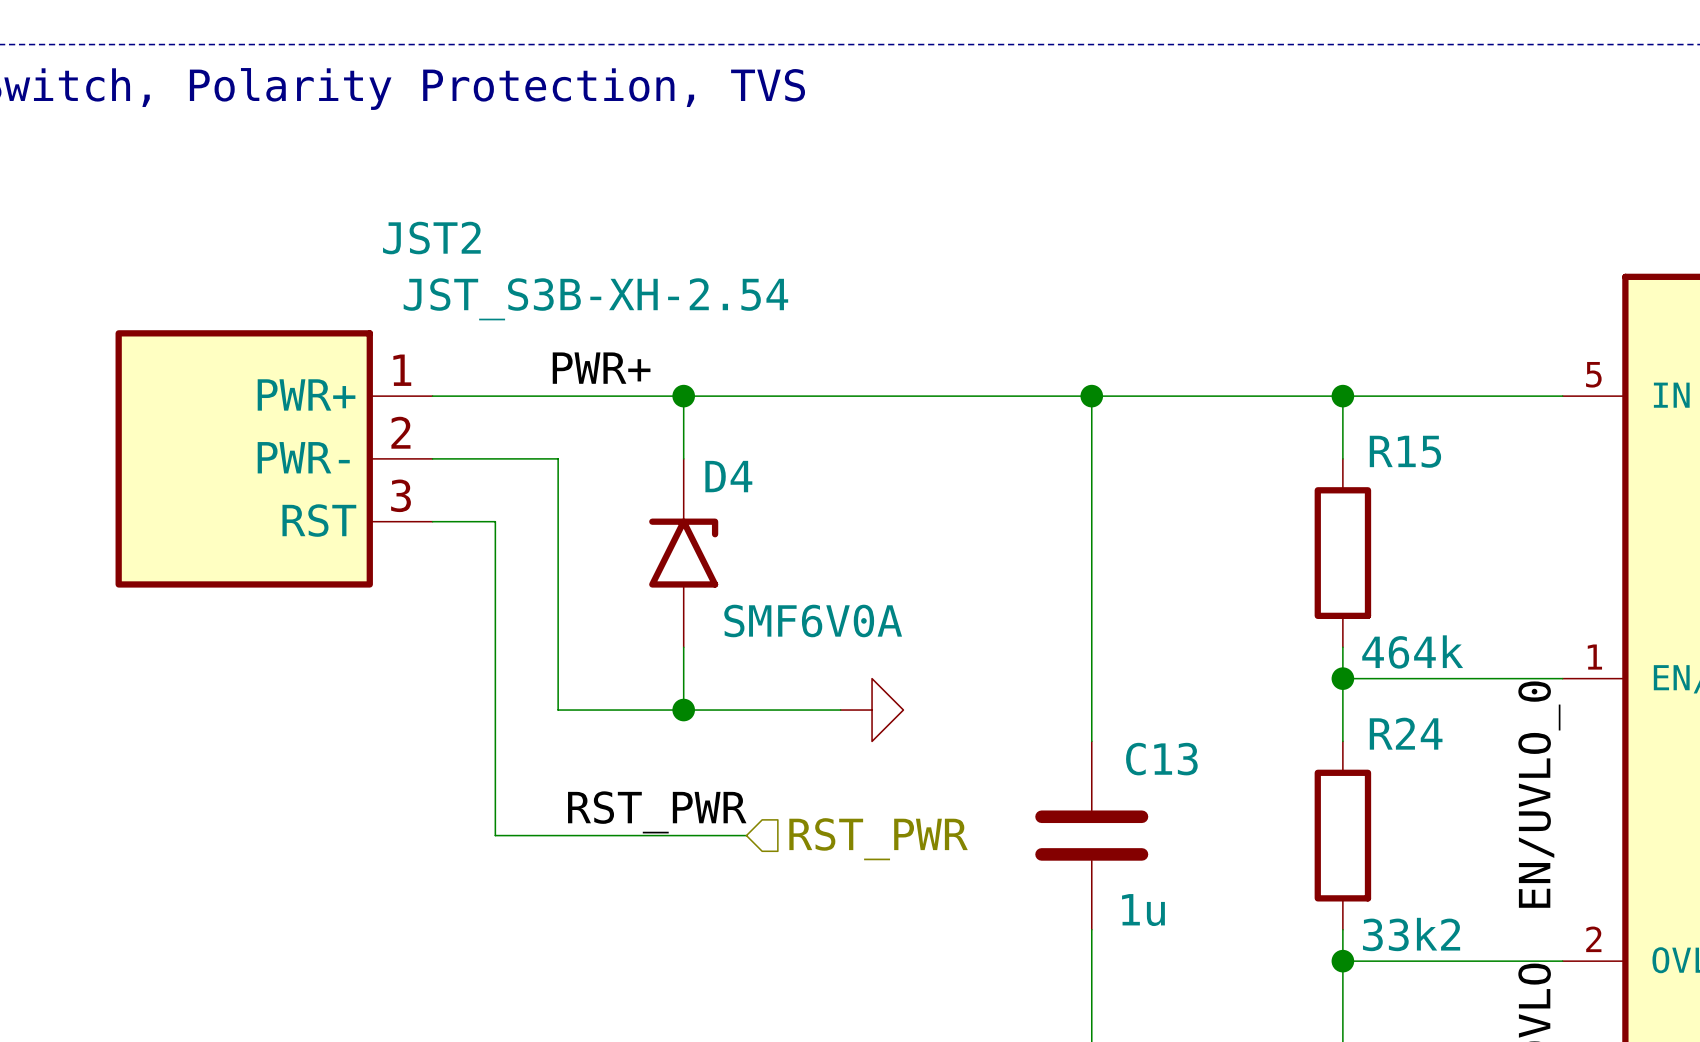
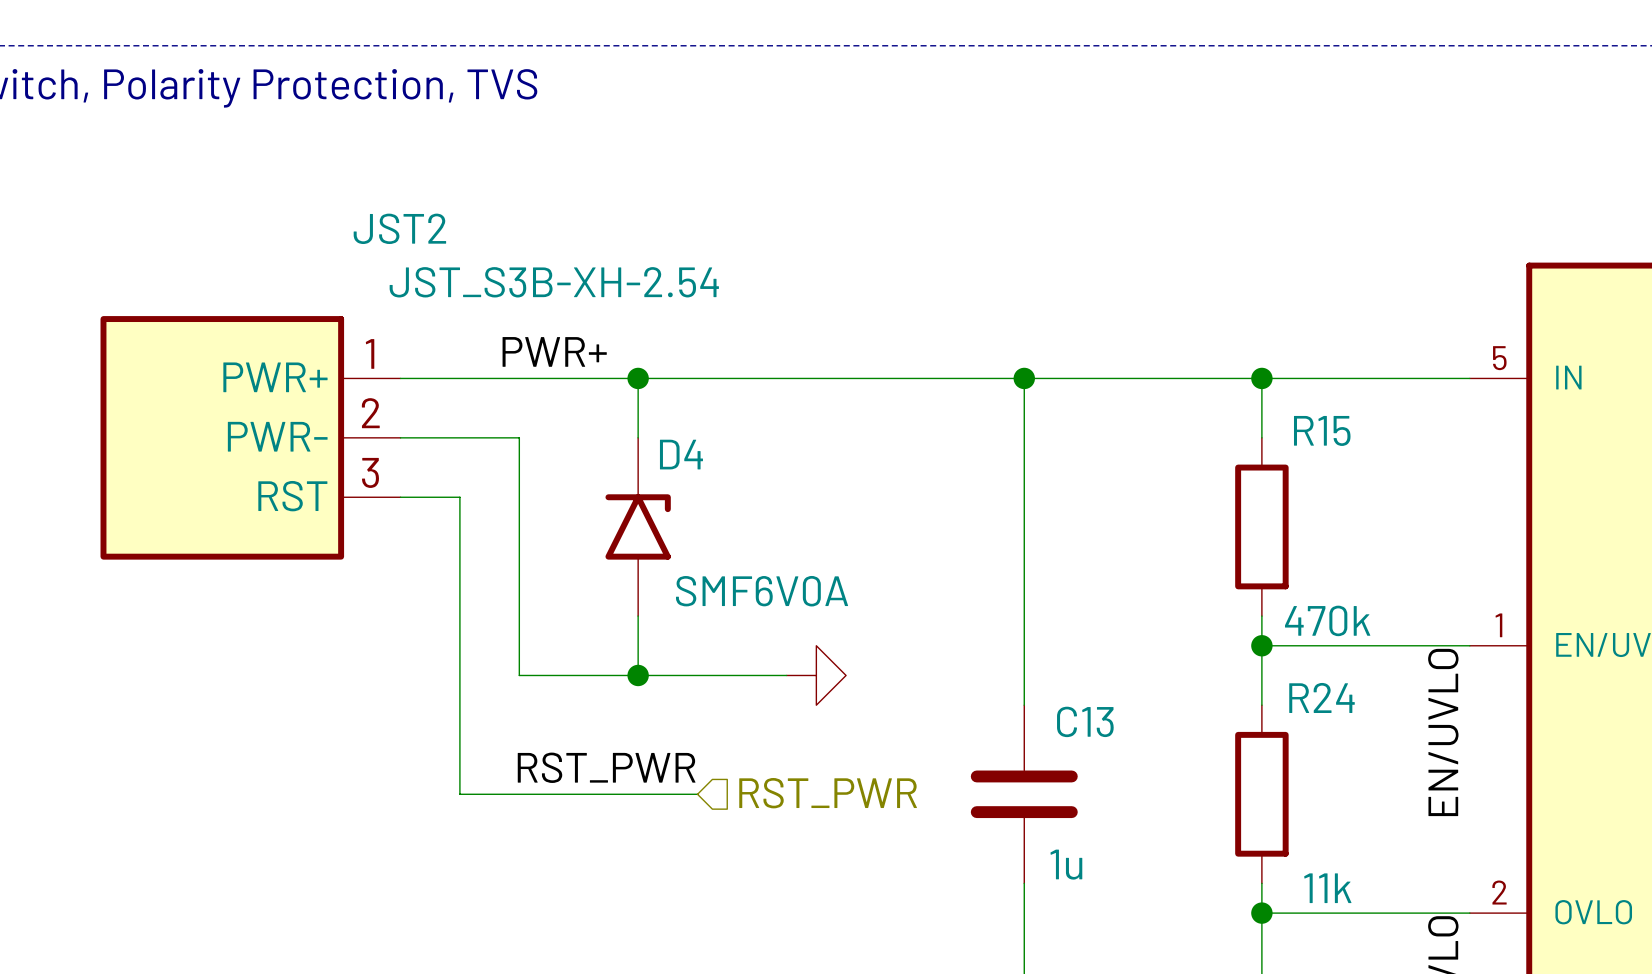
R15 value: 464k (1412, 651) -> 470k (1327, 620)
label: EN/UVLO_0 (1539, 794) -> EN/UVLO (1443, 732)
R24 value: 33k2 (1411, 934) -> 11k (1327, 888)

